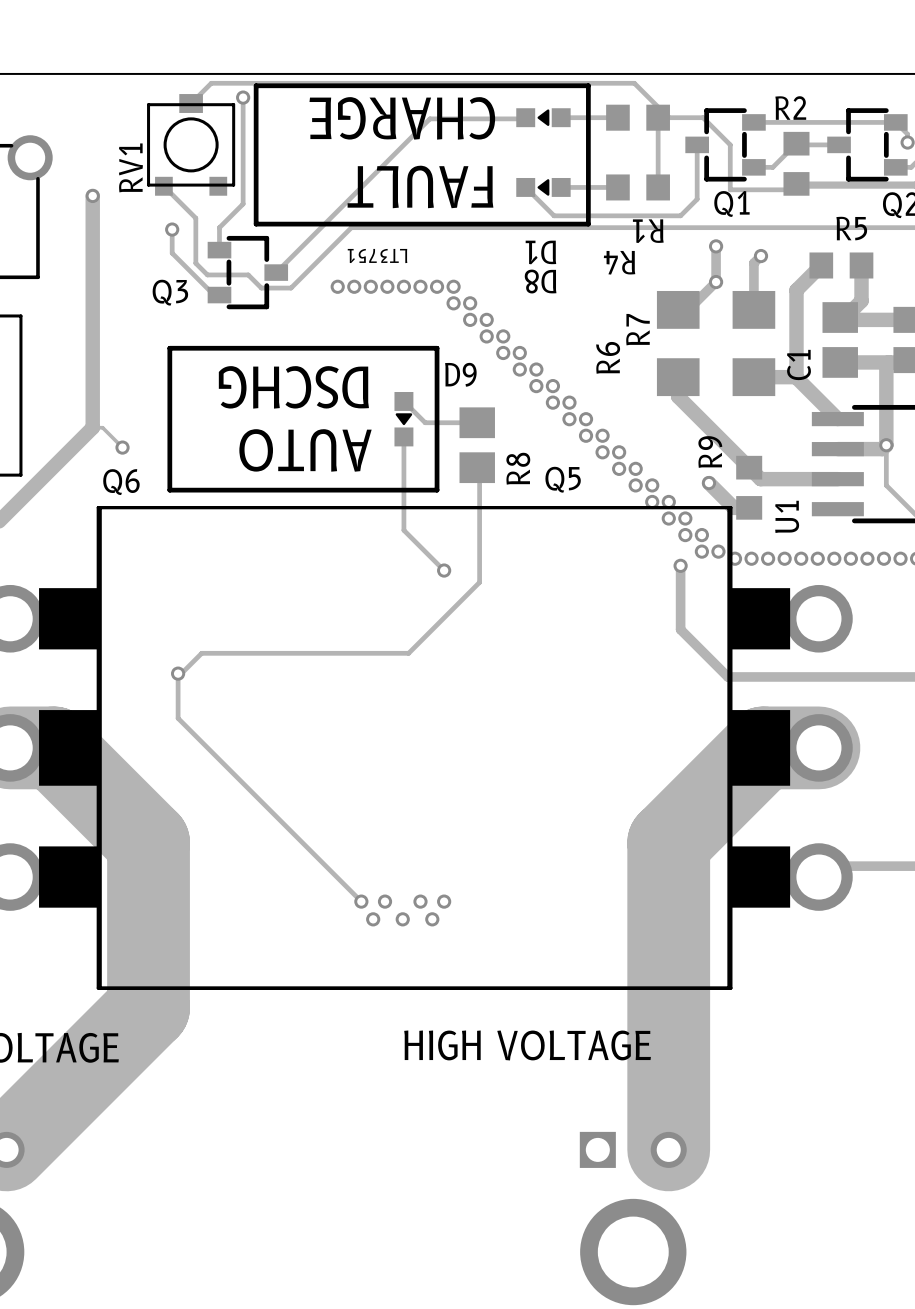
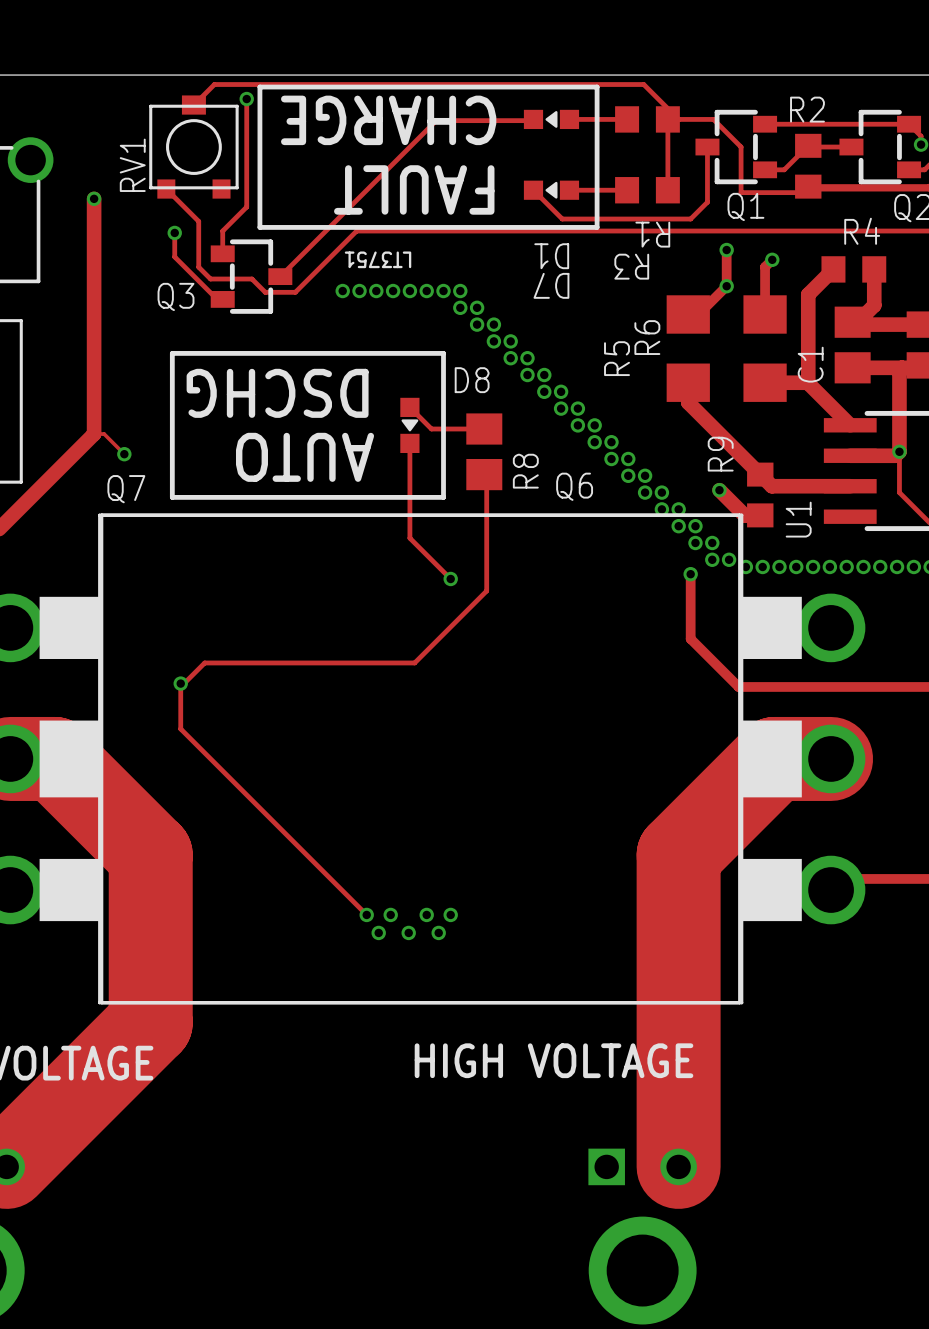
R5 name: R5 (851, 228) -> R4 (862, 231)
R4 name: R4 (619, 262) -> R3 (631, 266)
D8 name: D8 (540, 281) -> D7 (551, 285)
R7 name: R7 (637, 329) -> R6 (647, 337)
R6 name: R6 (608, 357) -> R5 (617, 358)
D9 name: D9 (460, 374) -> D8 (472, 380)
Q5 name: Q5 (563, 479) -> Q6 (574, 486)
Q6 name: Q6 (121, 482) -> Q7 (126, 489)

